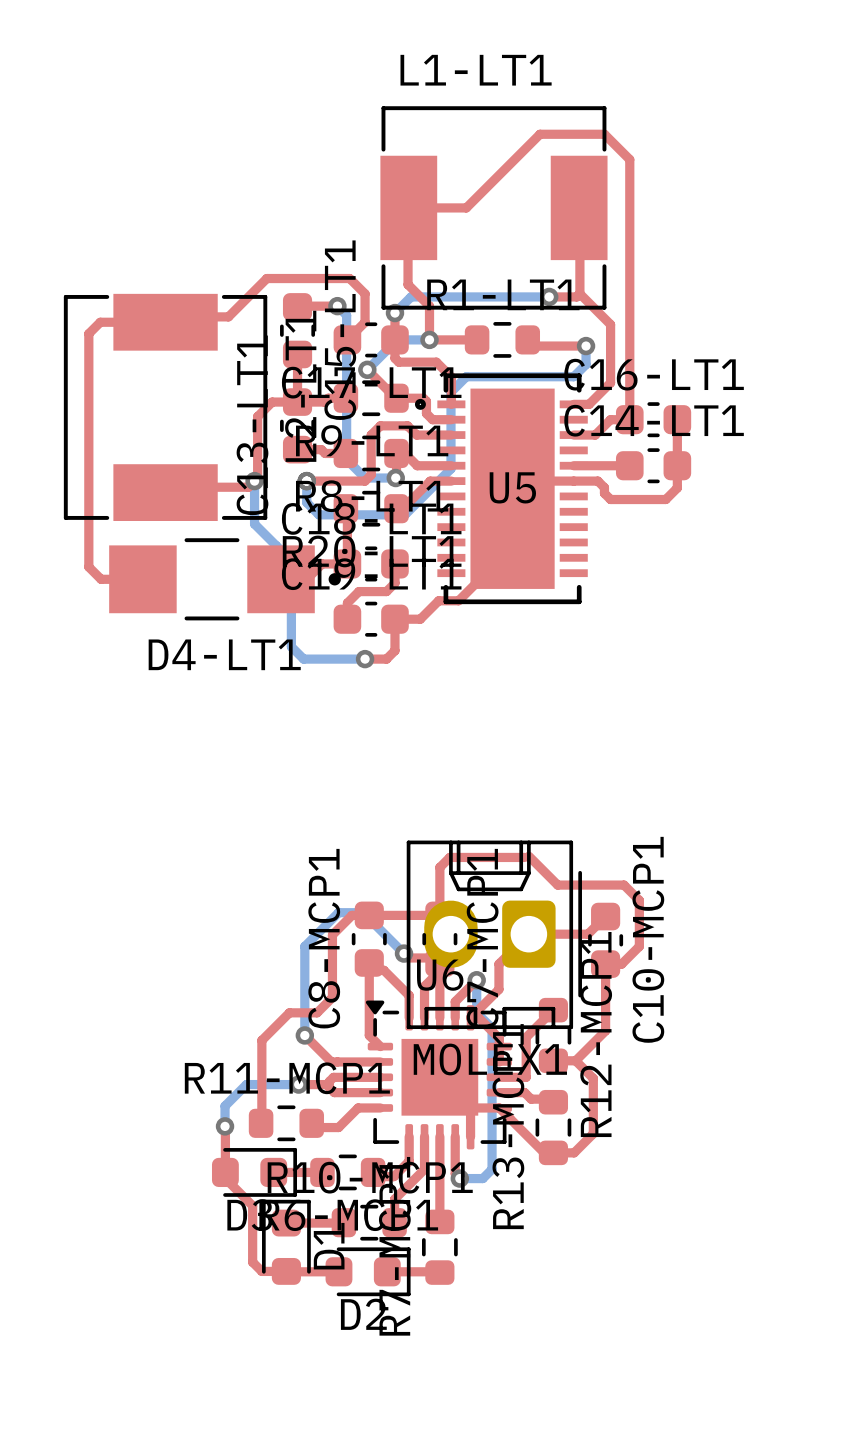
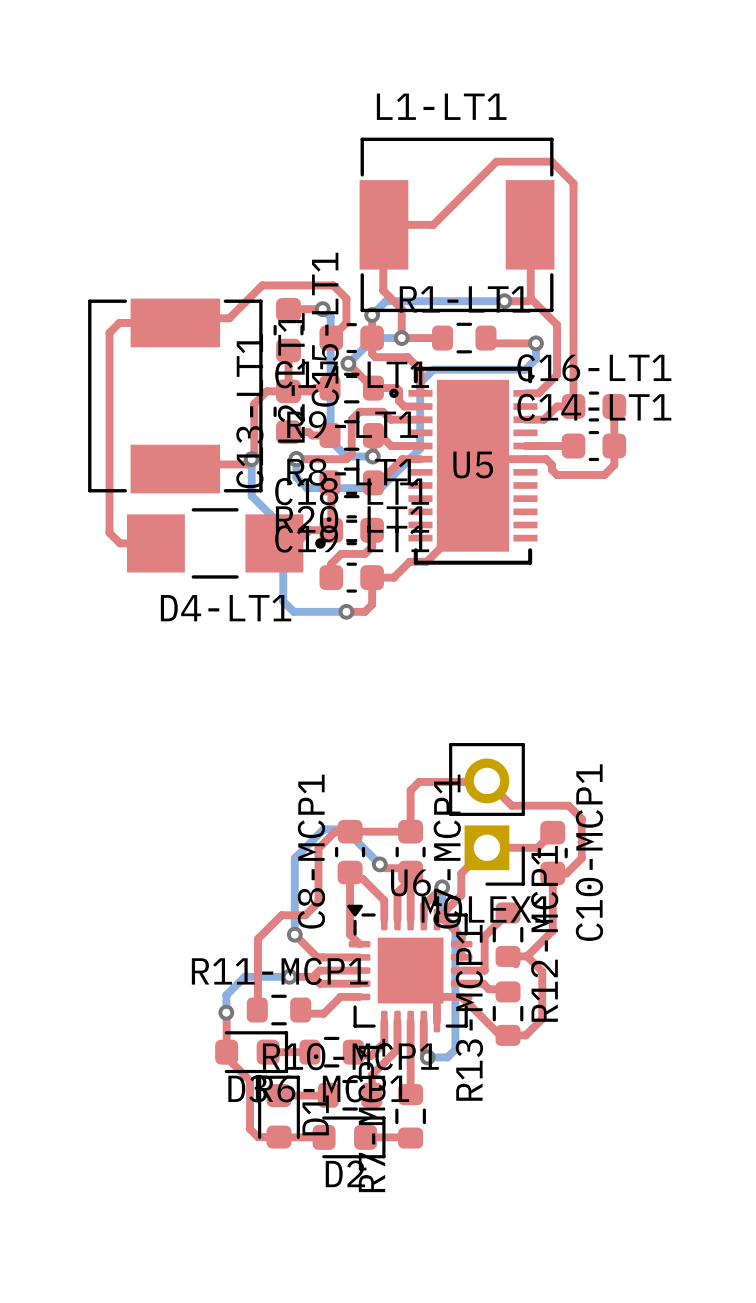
MOLEX1 footprint: [406, 840, 582, 1030] -> [449, 743, 525, 886]

